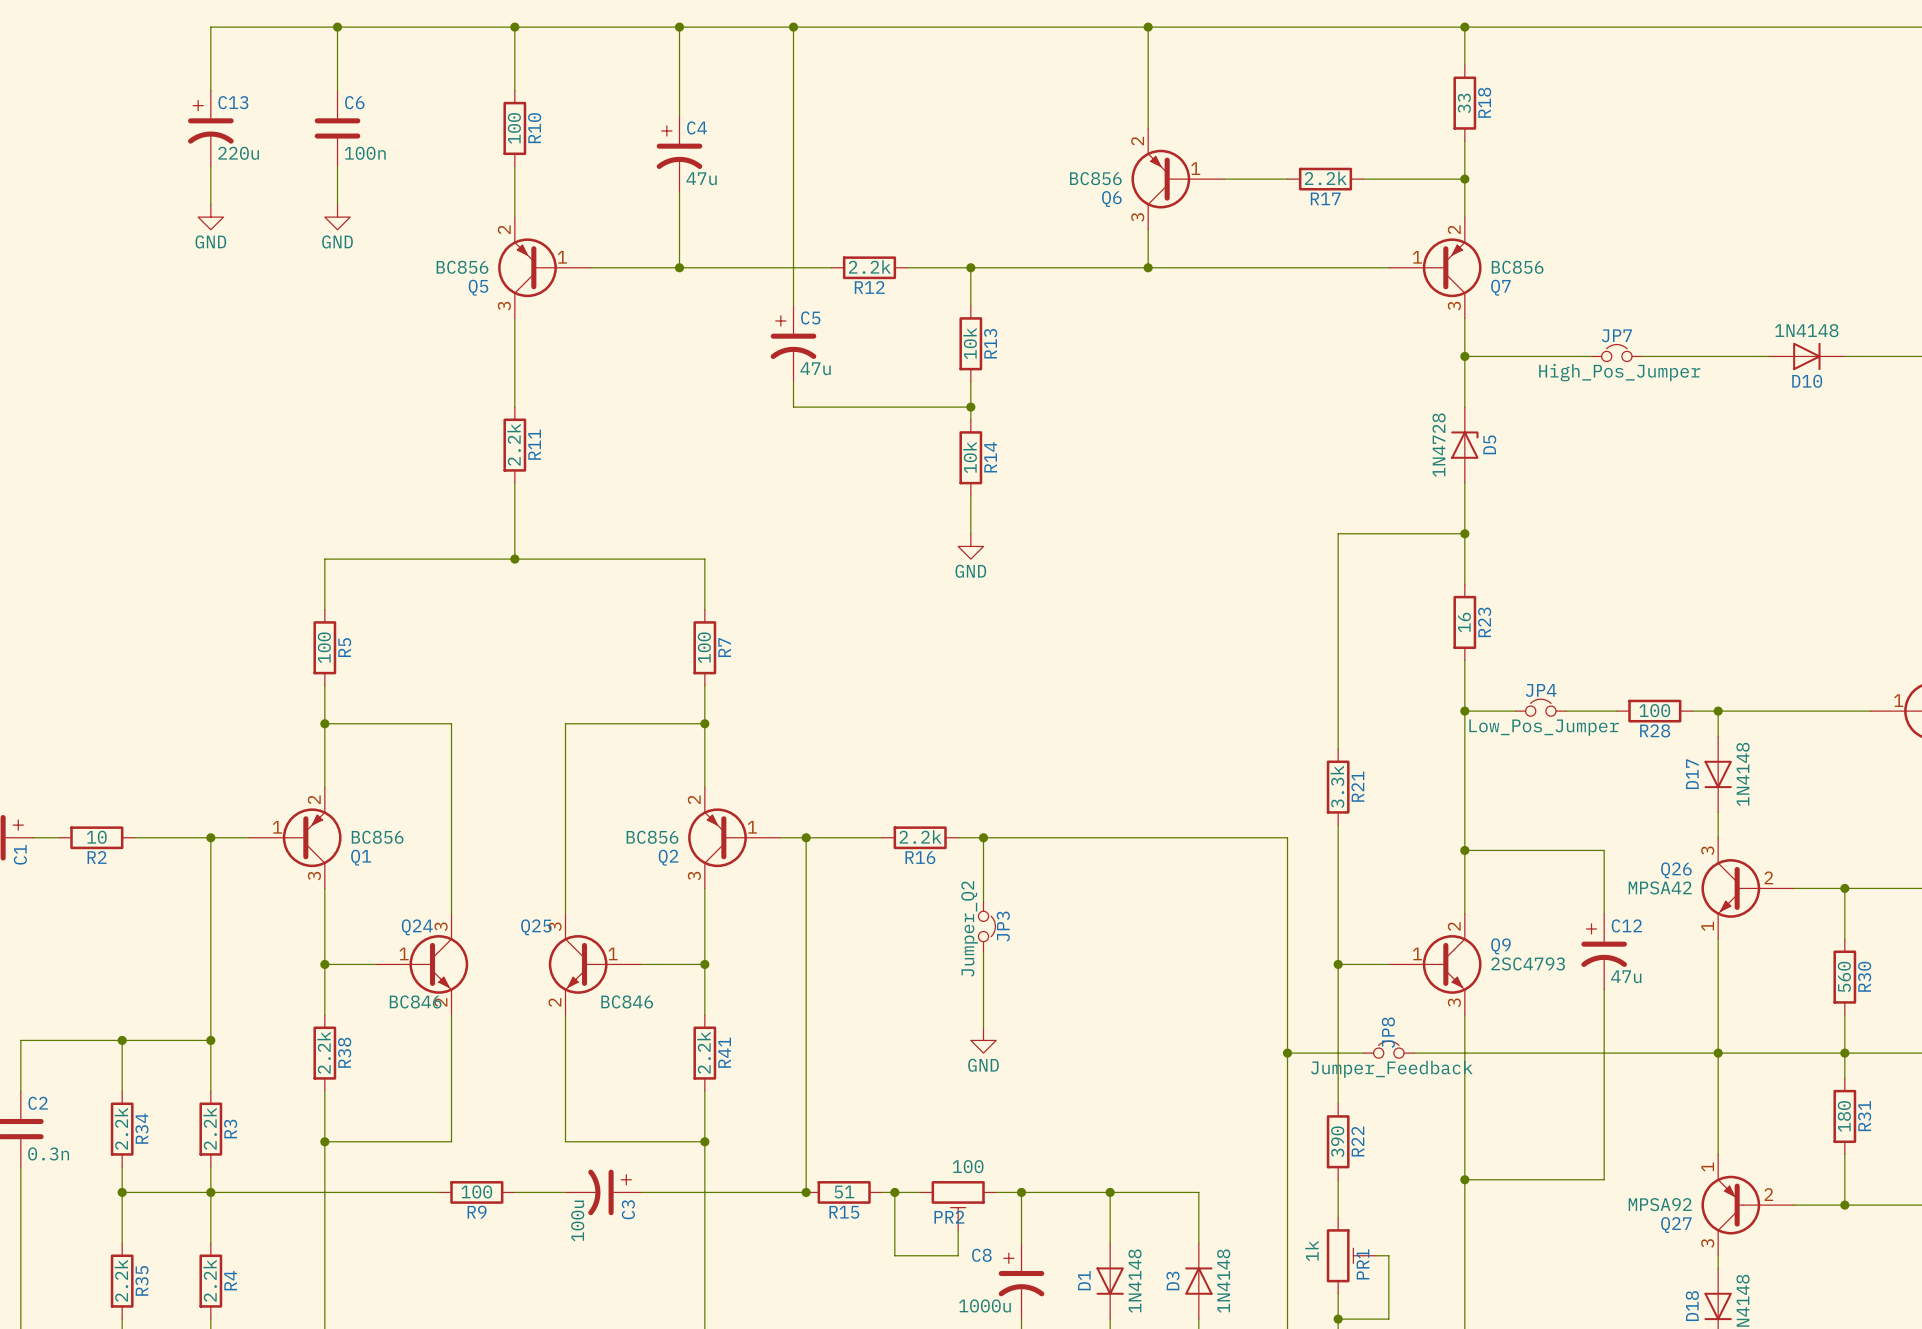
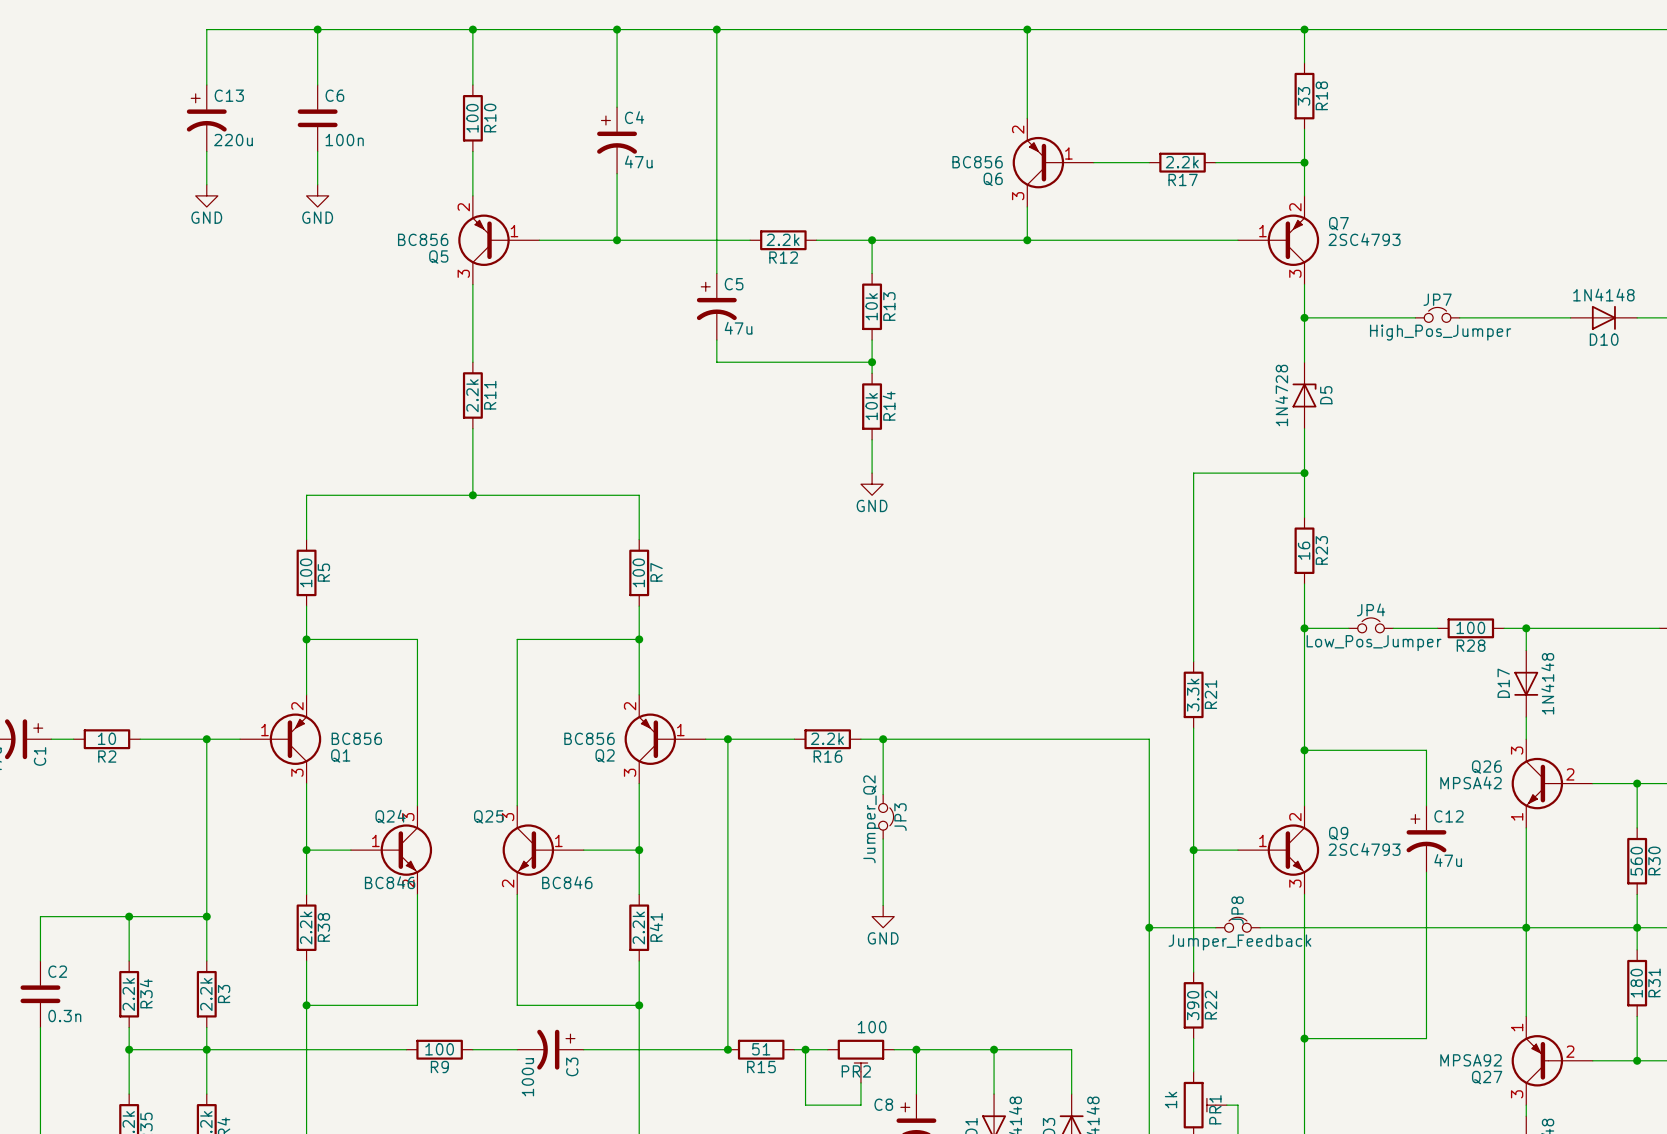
Q7 value: BC856 (1517, 267) -> 2SC4793 (1364, 239)
Q7 name position: Q7 (1500, 287) -> Q7 (1338, 223)

